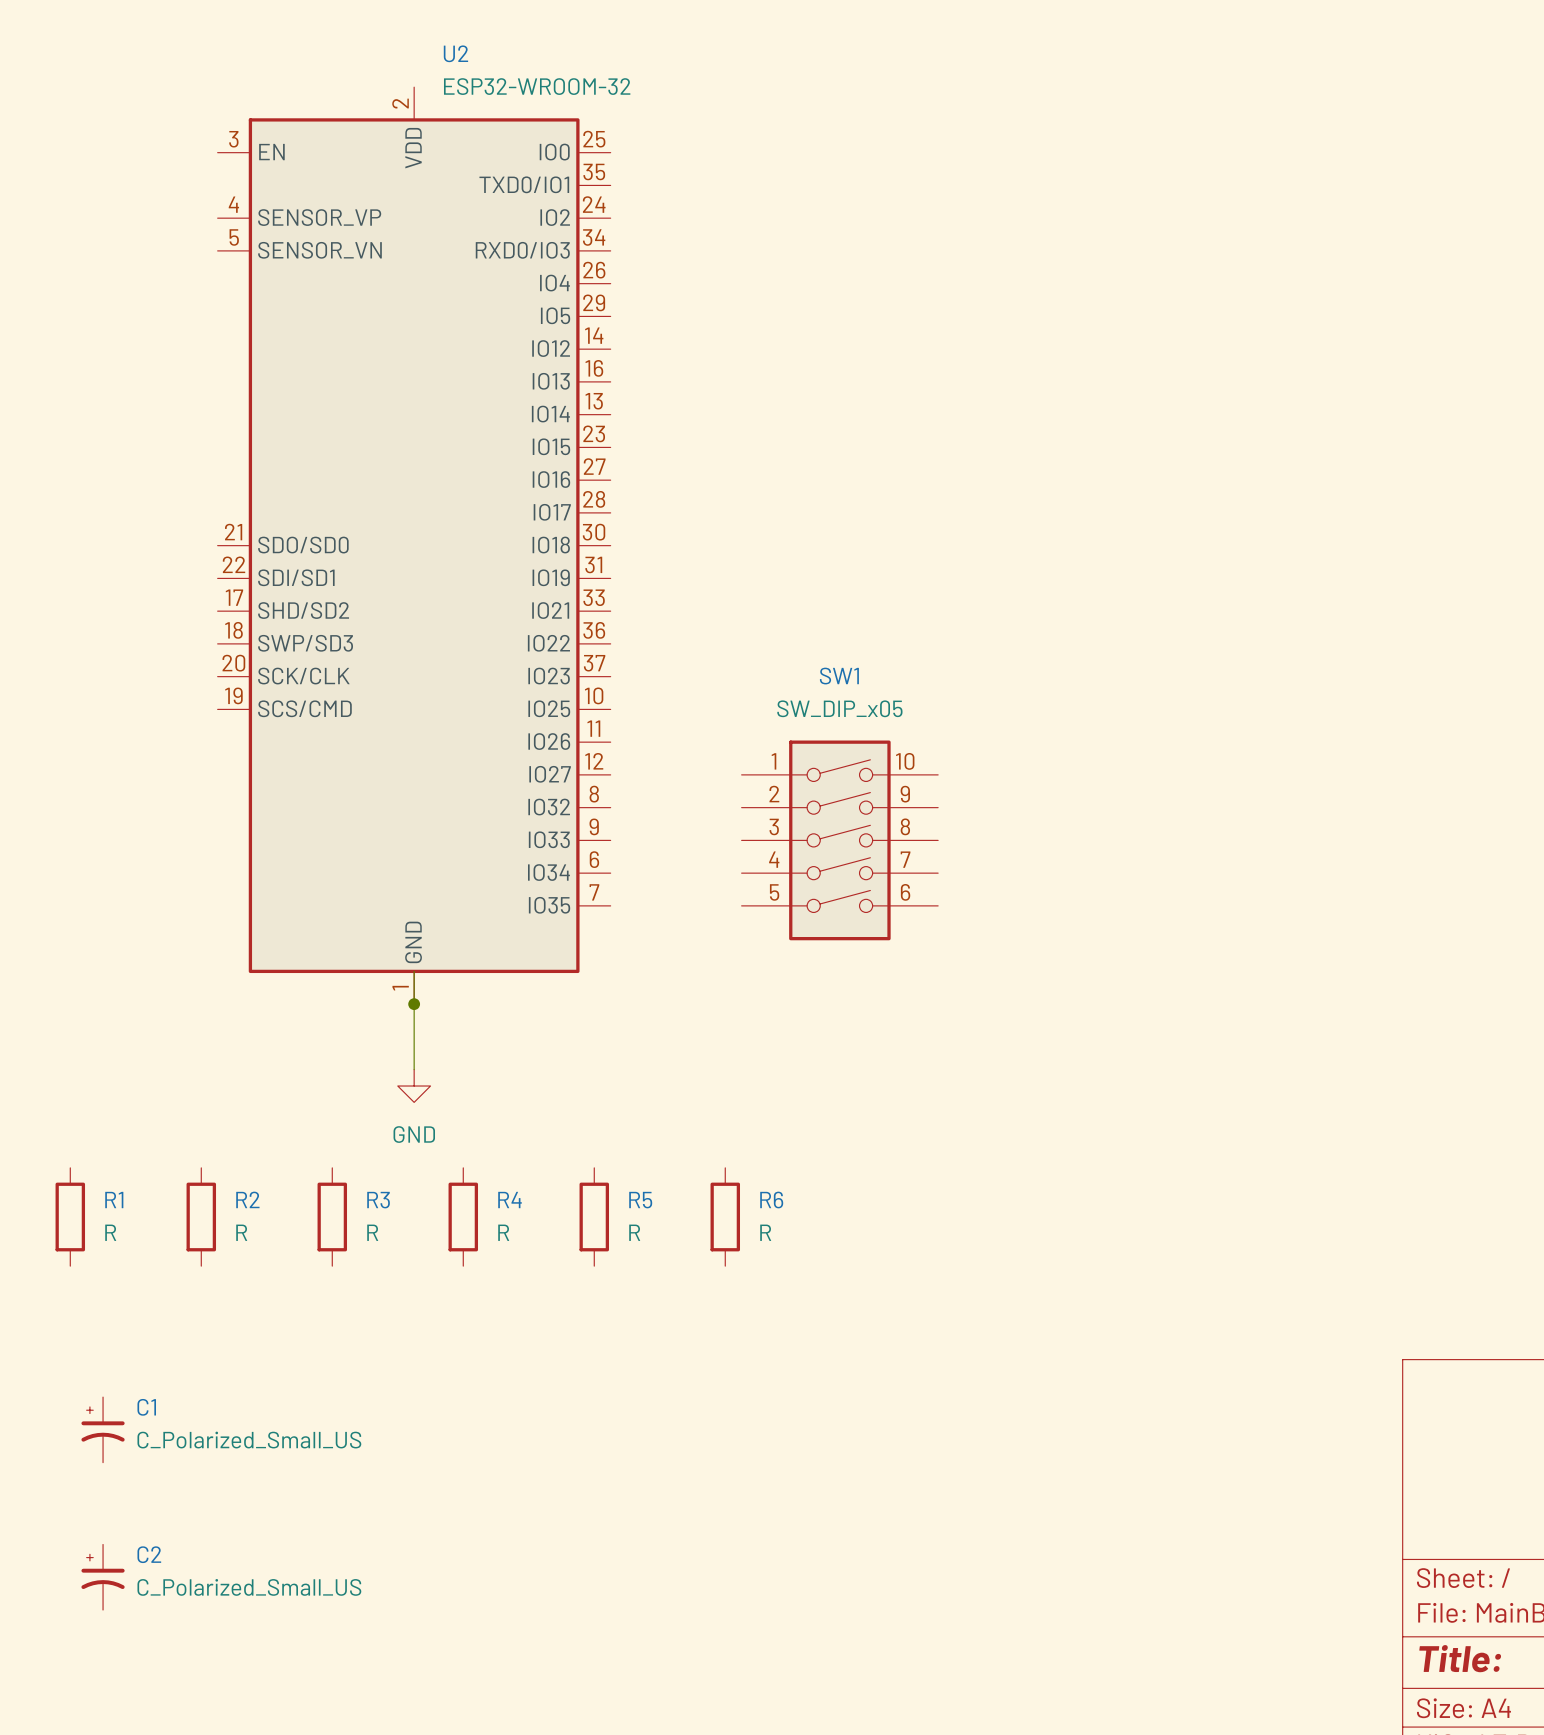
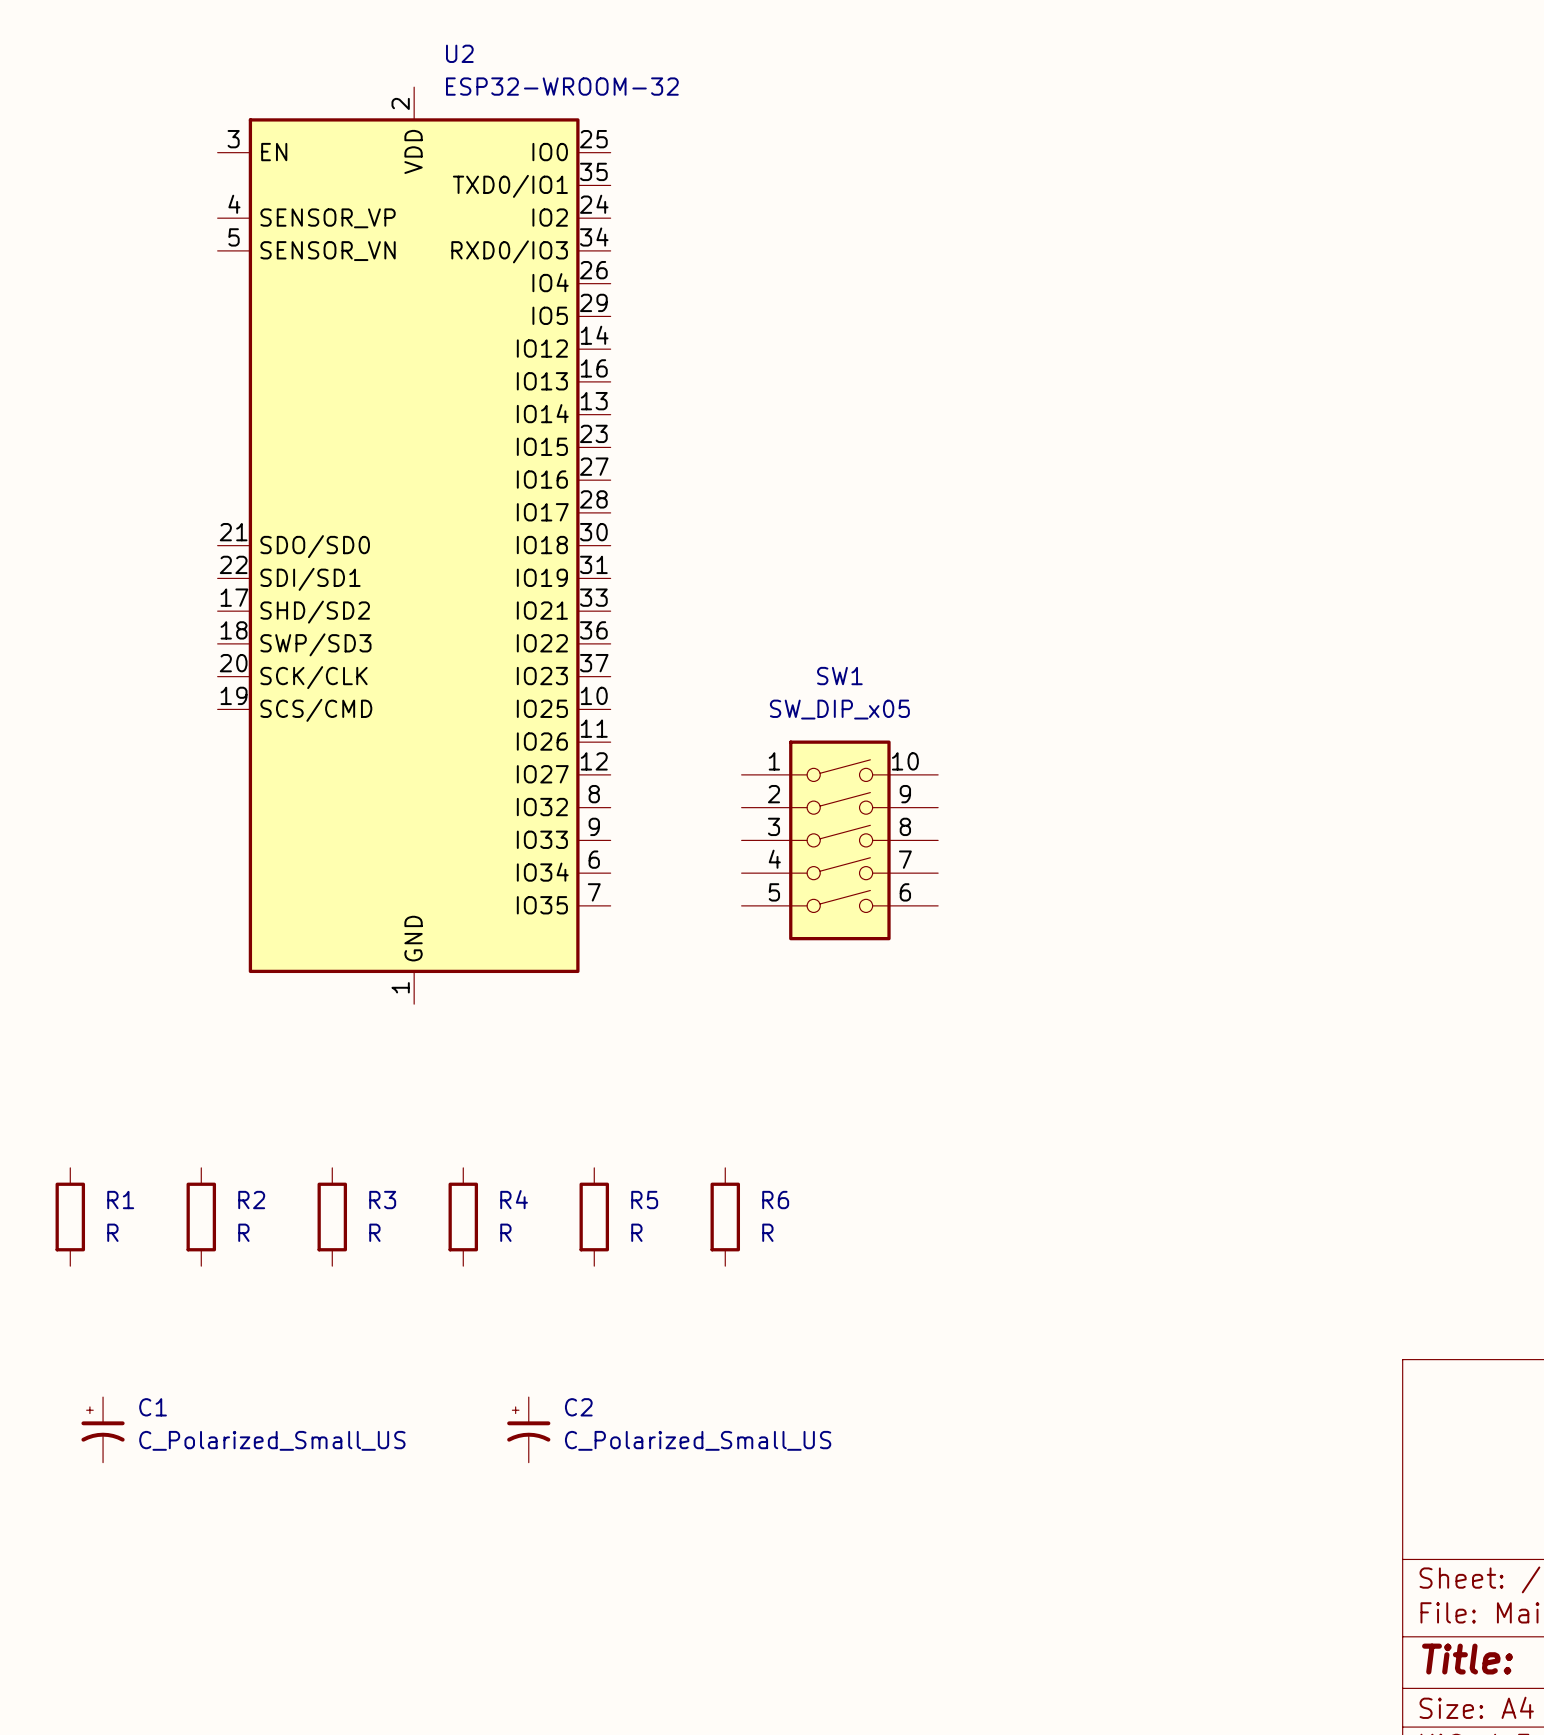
wire: (414, 971) (414, 1069) -> none
junction: (414, 1004) -> none
power symbol: GND (414, 1086) -> none
C2 position: (103, 1577) -> (528, 1429)

